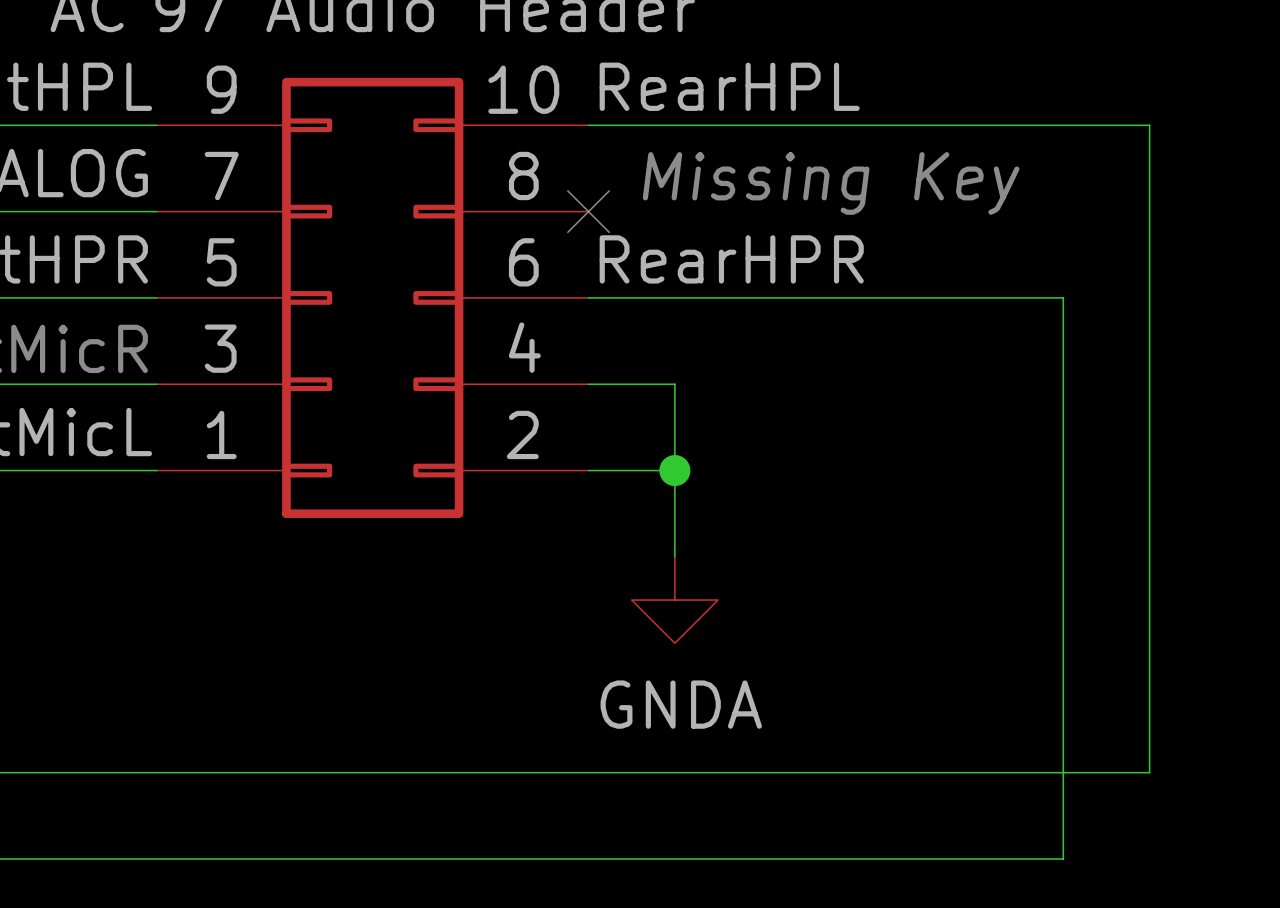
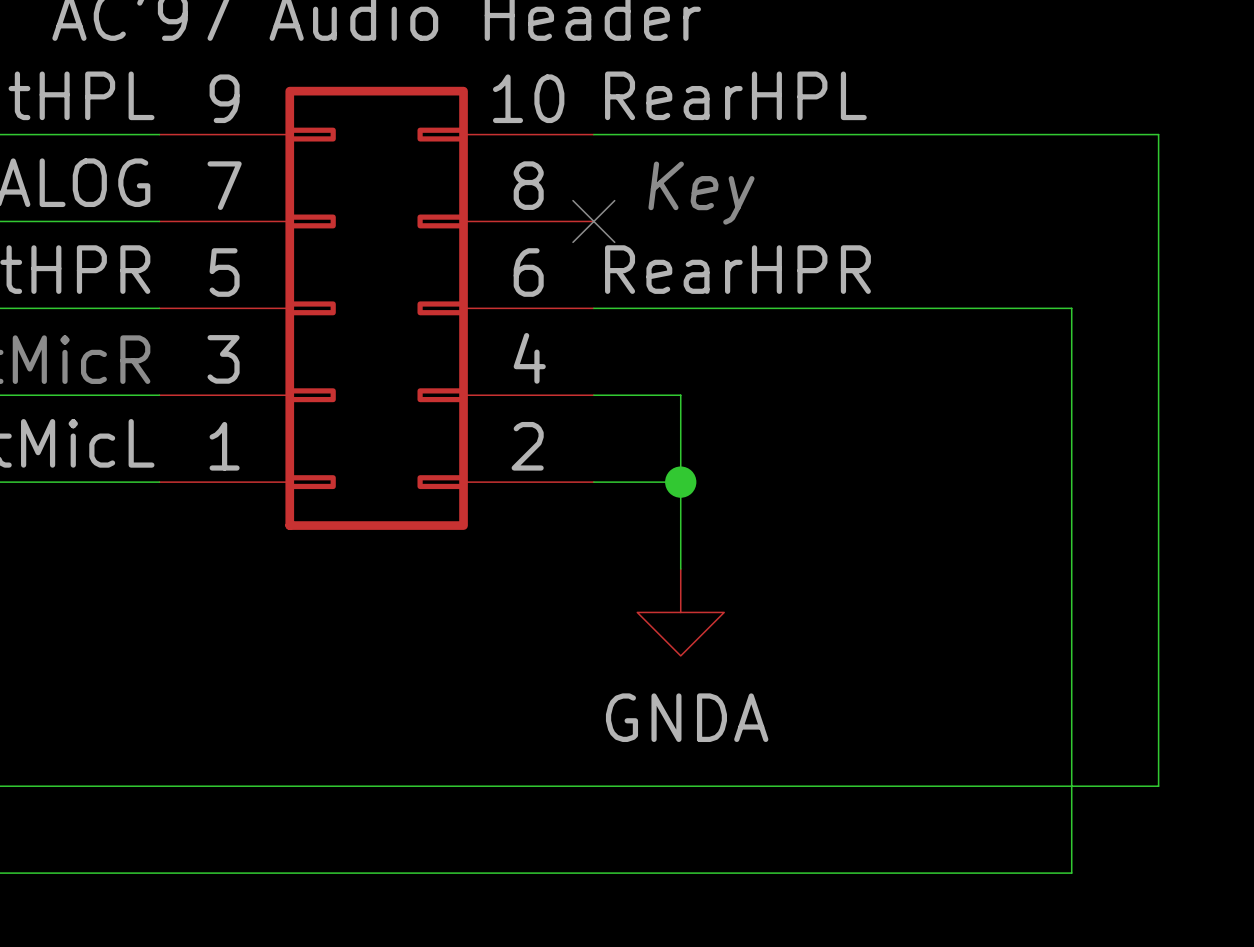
text: Missing Key (831, 183) -> Key (701, 193)

